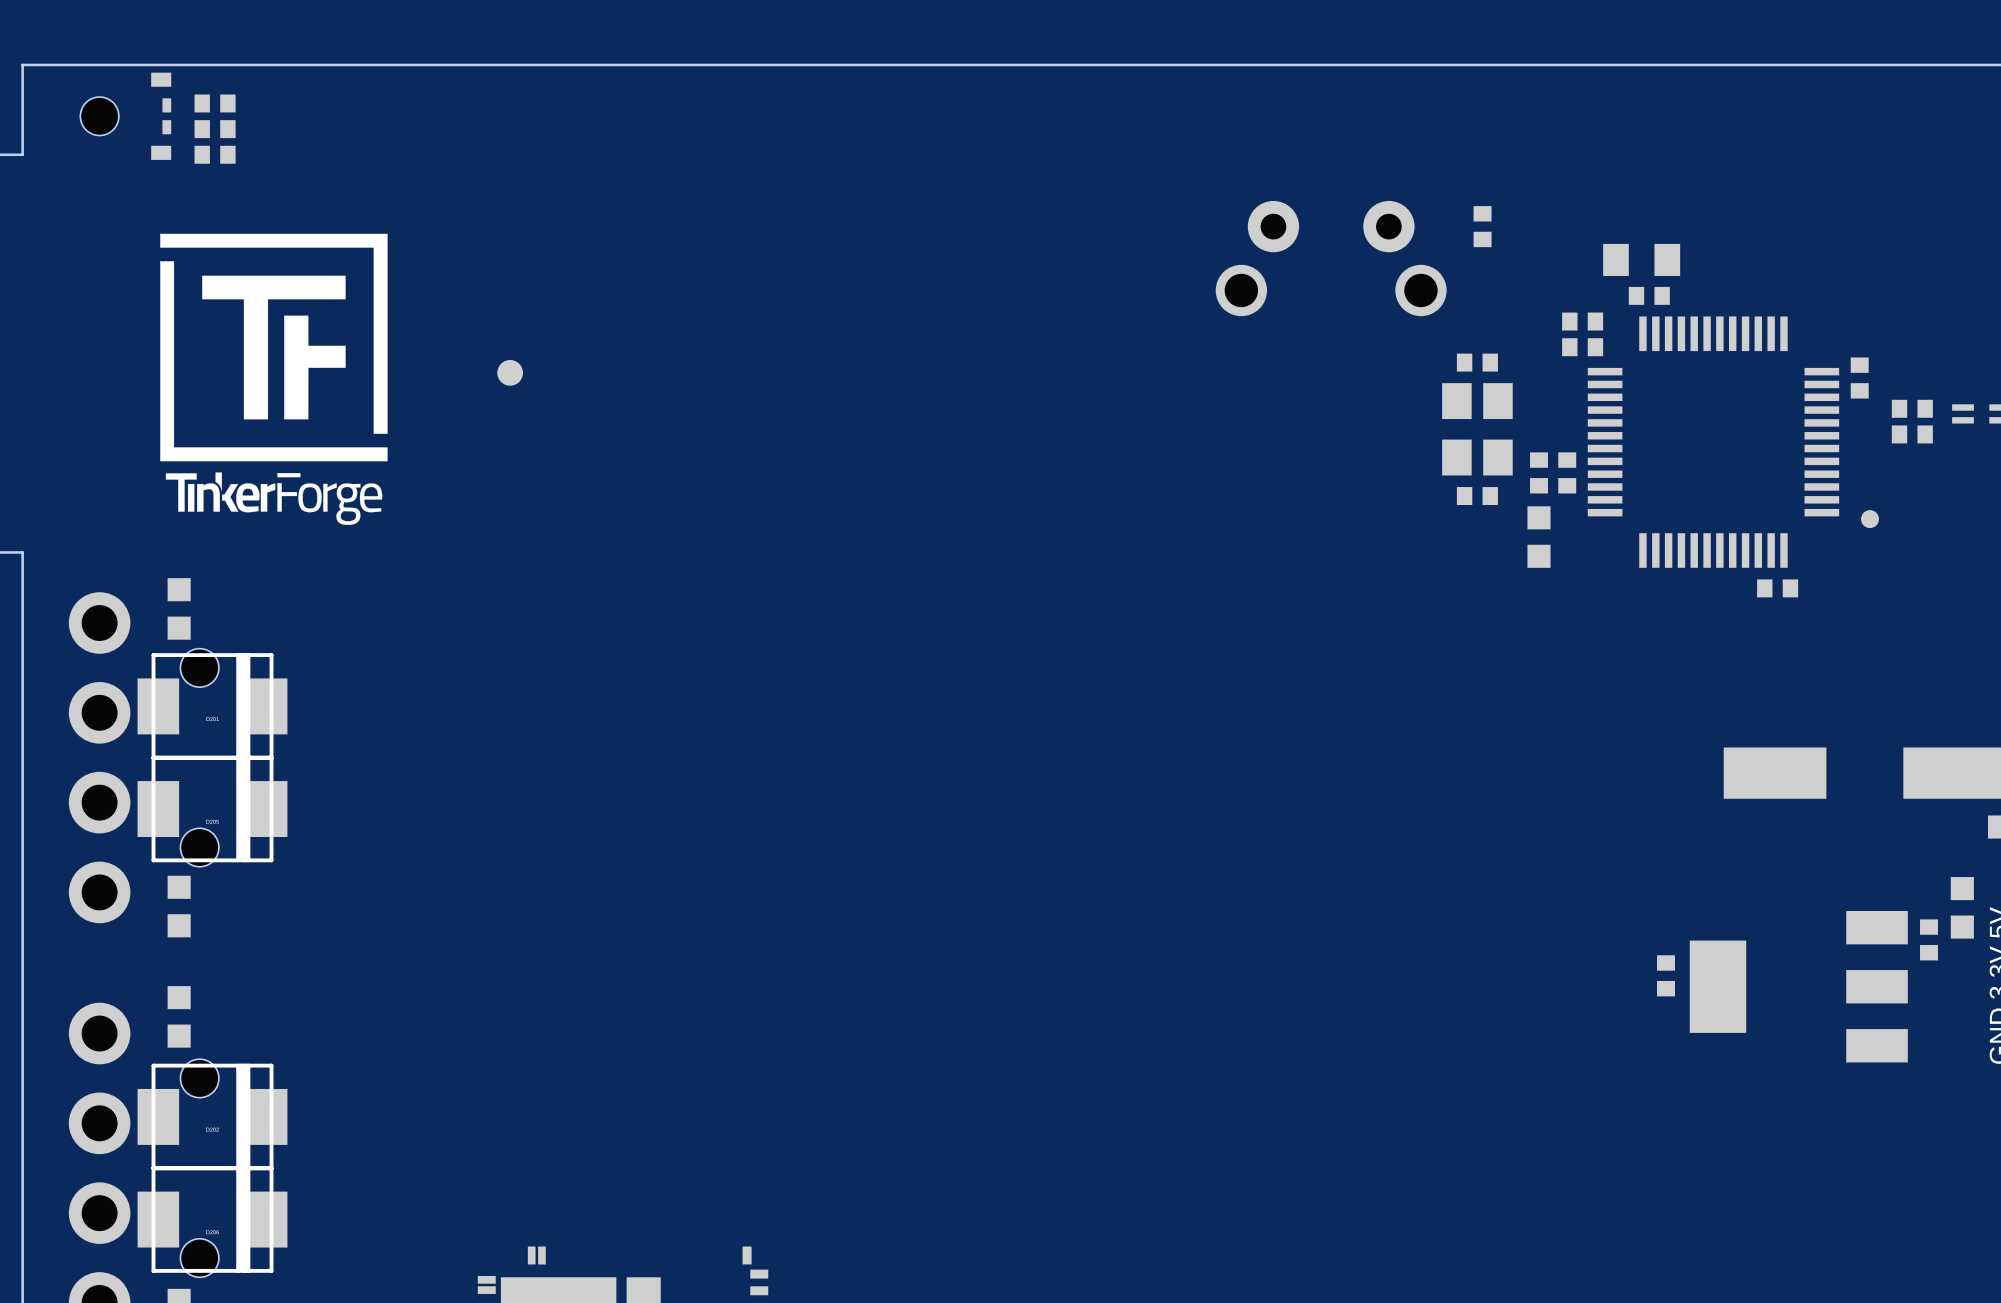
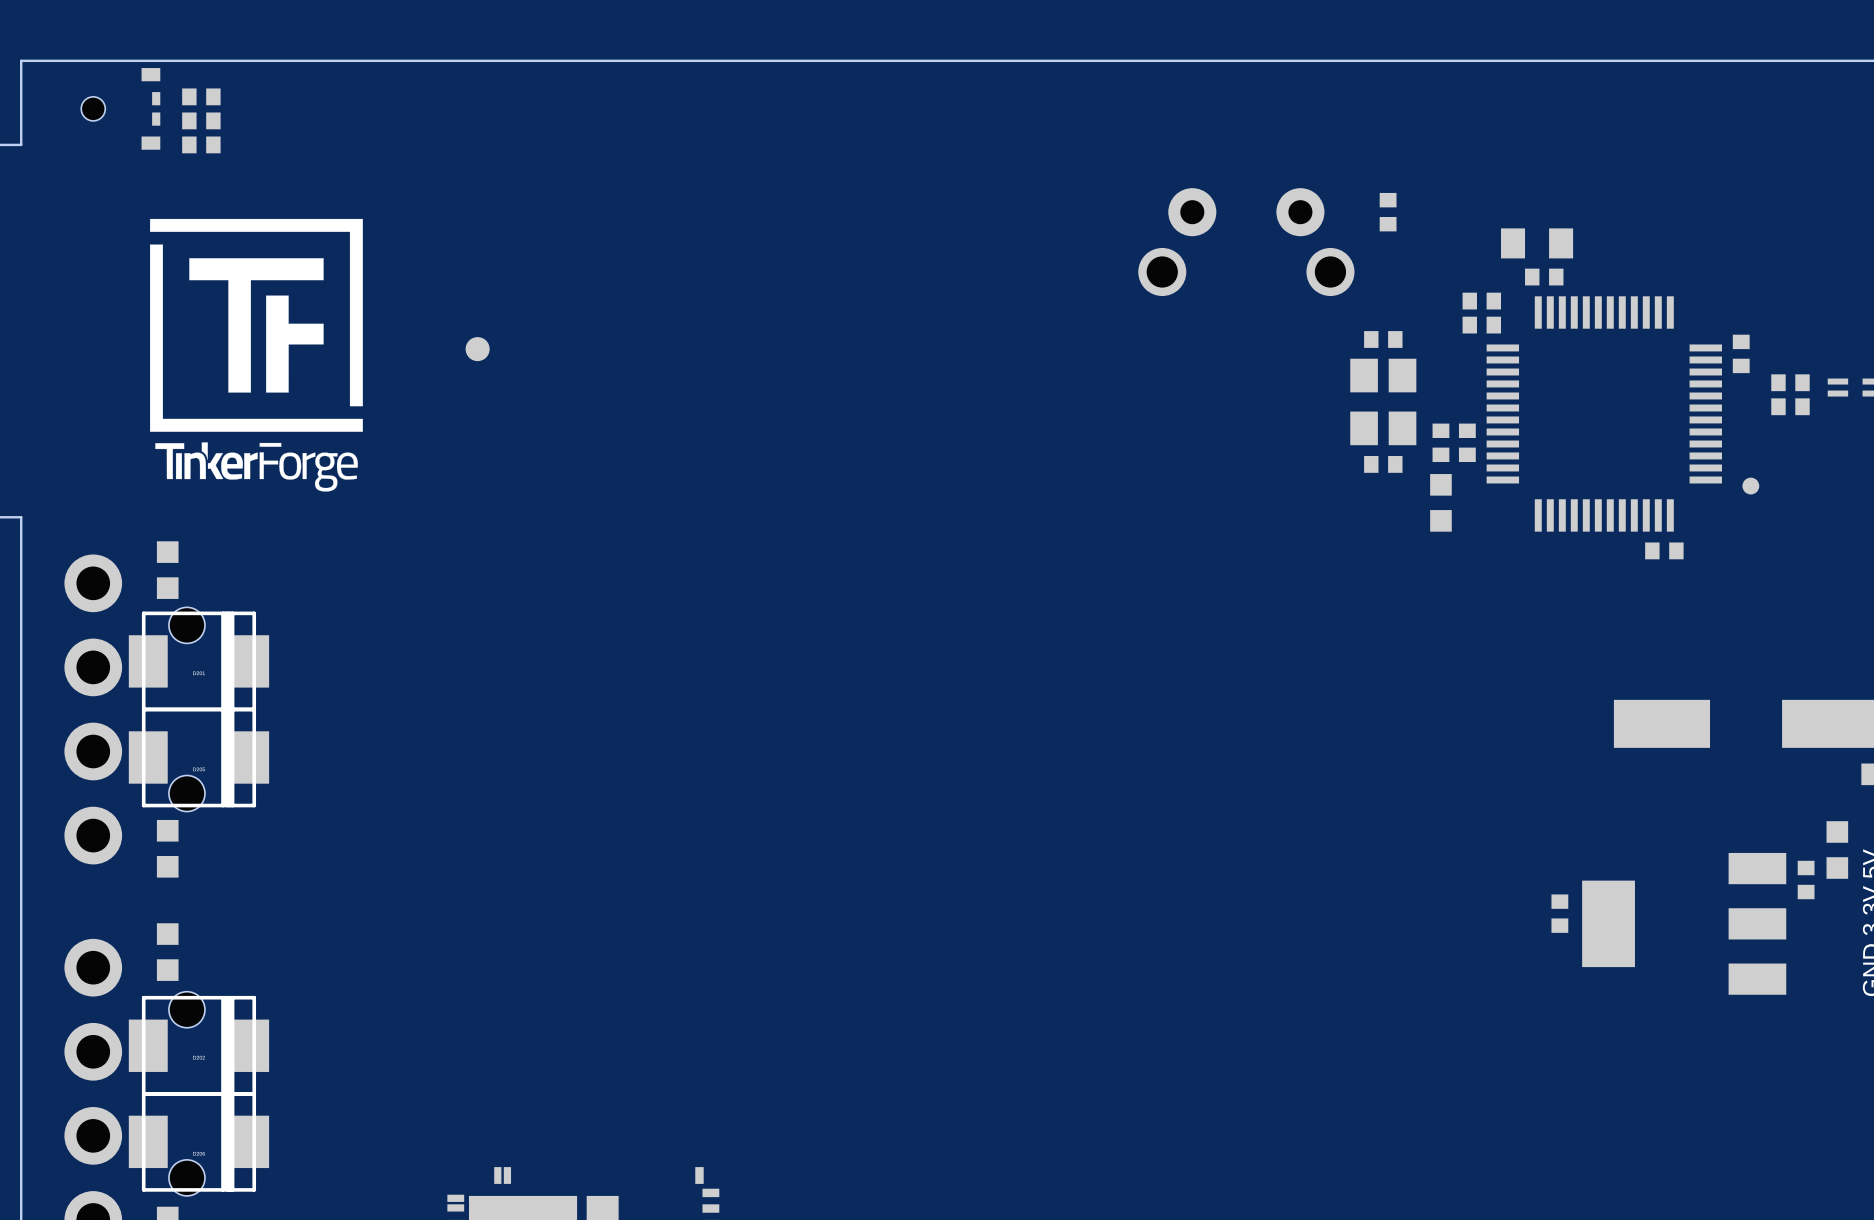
part footprint: [80, 72, 172, 160] -> [81, 68, 161, 150]

